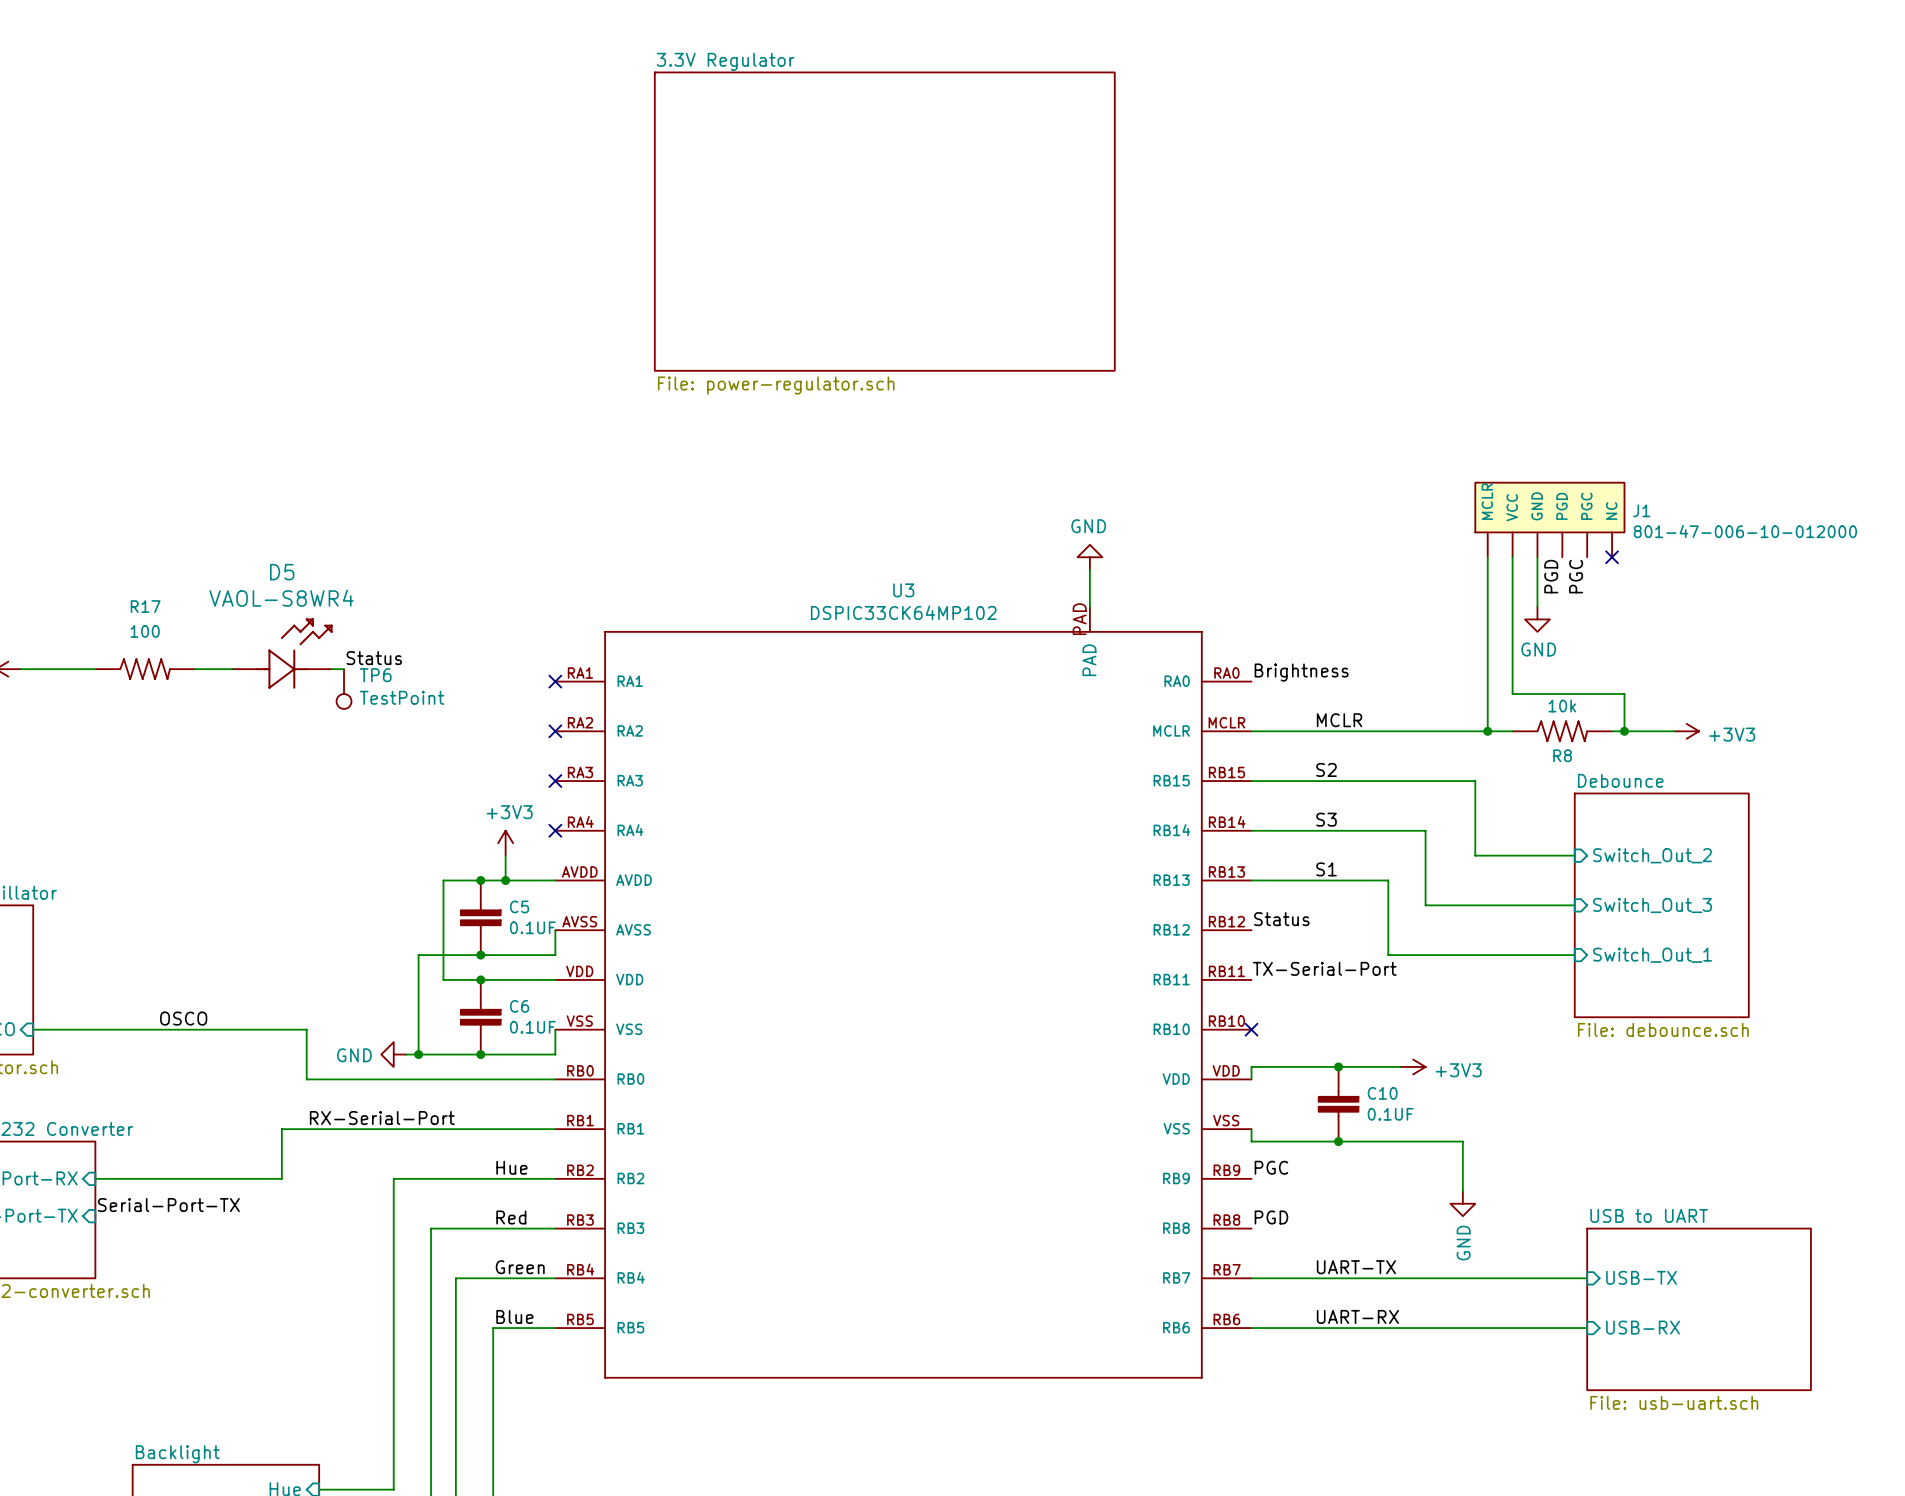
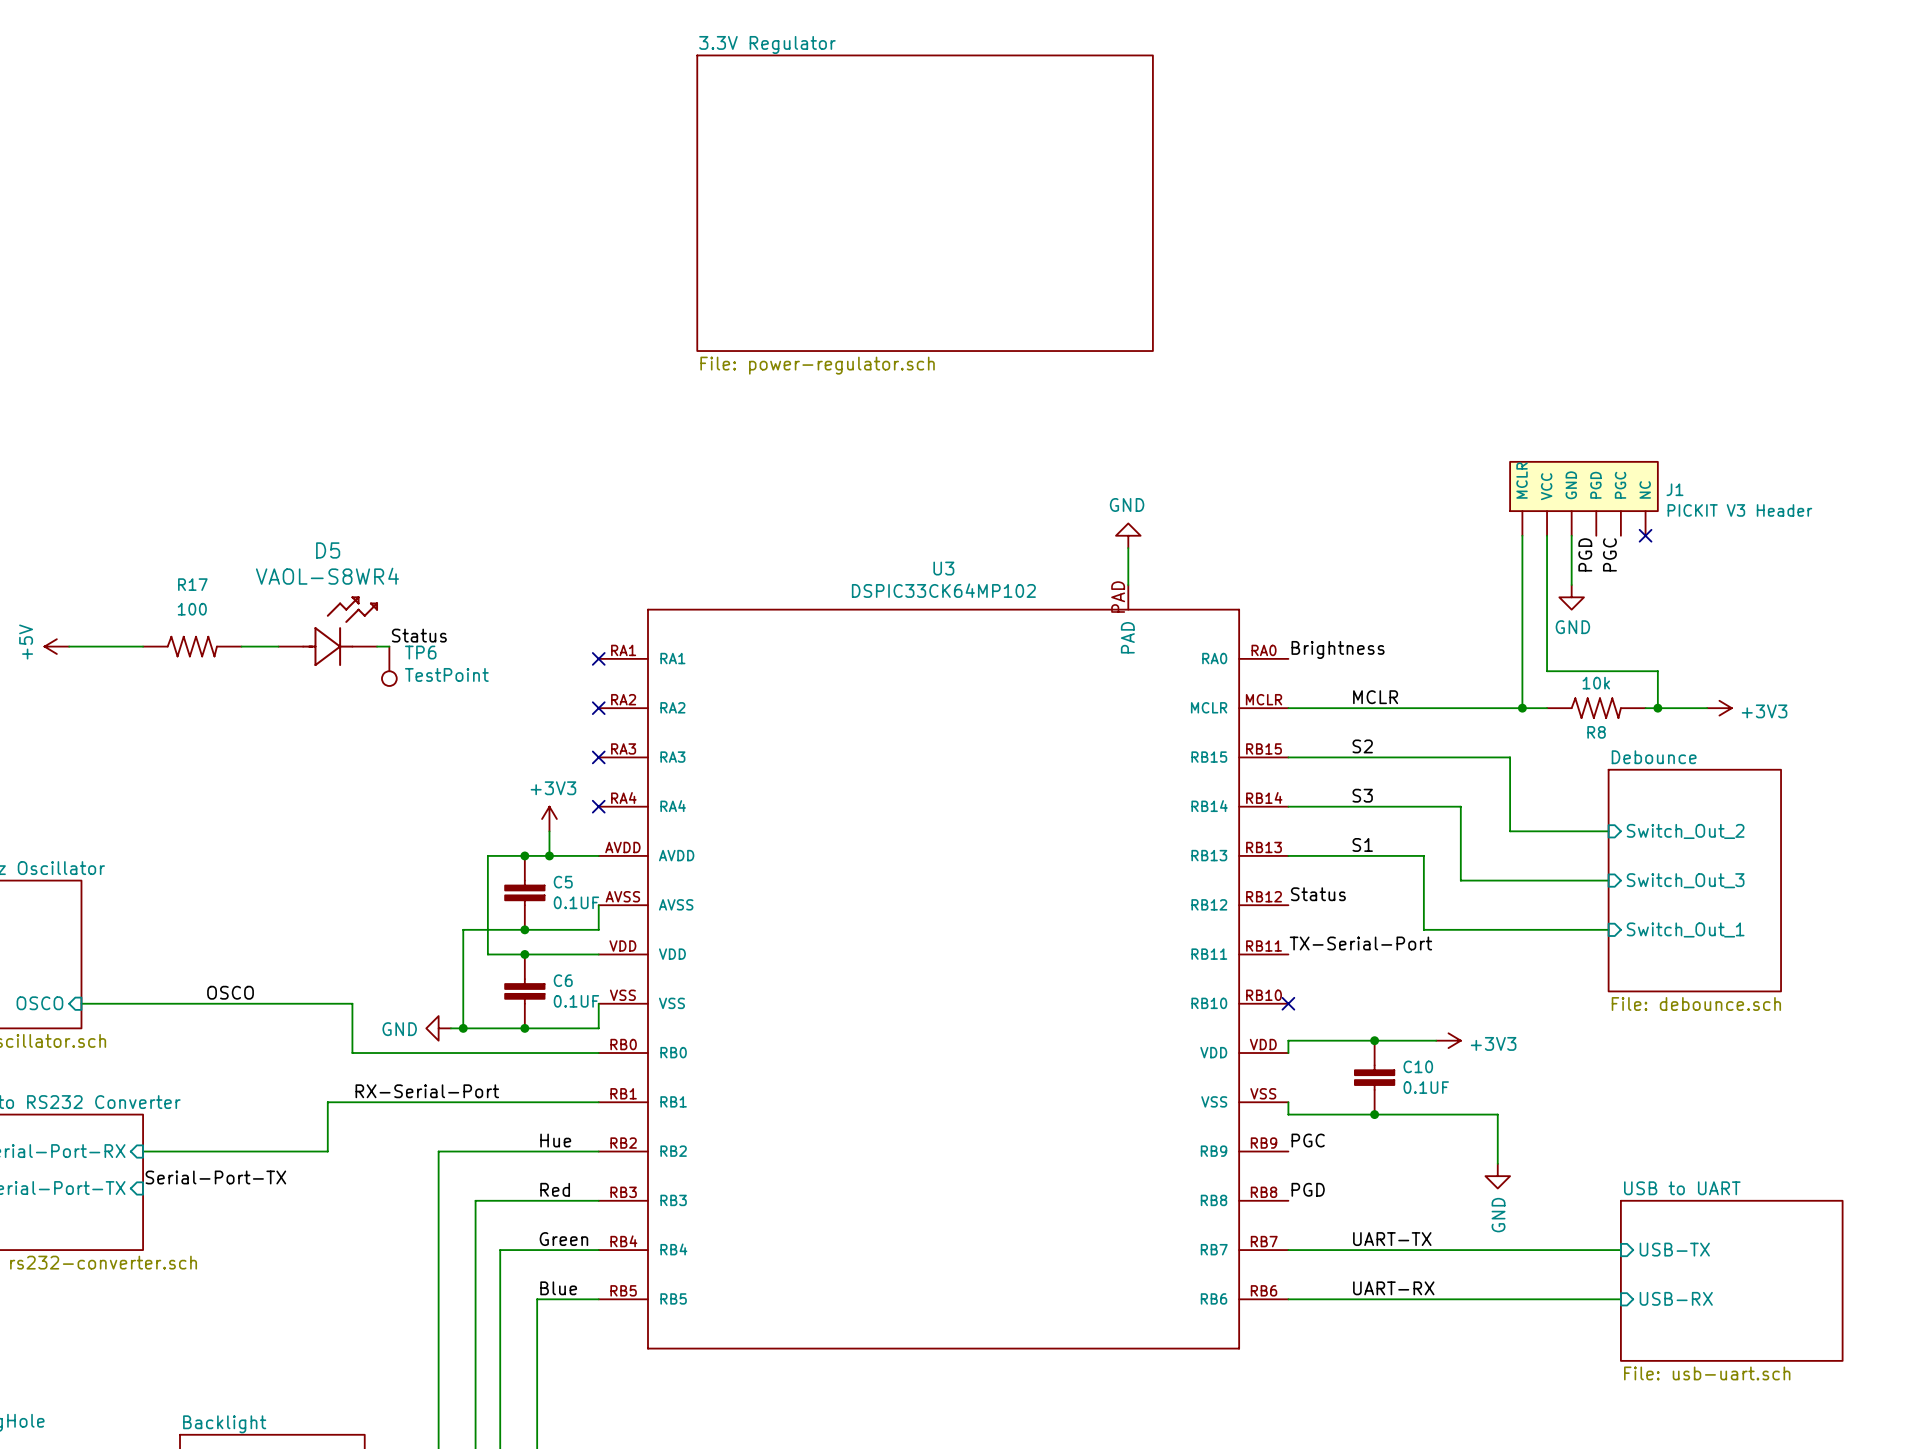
J1 value: 801-47-006-10-012000 (1745, 531) -> PICKIT V3 Header (1739, 510)

